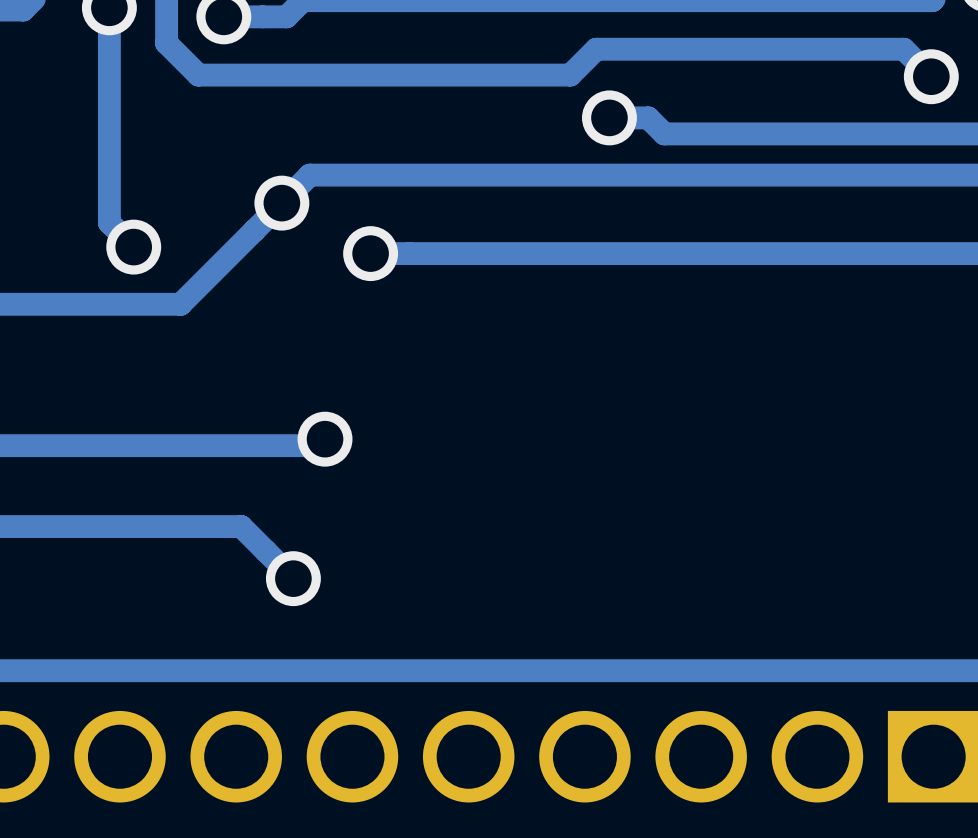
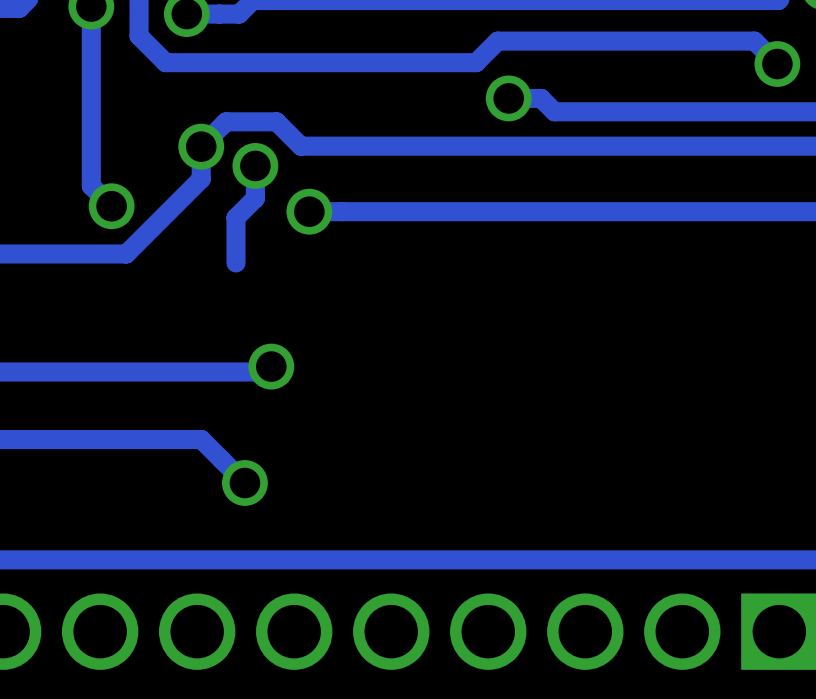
via: none -> (201, 146)
track: (360, 175) (309, 175) (180, 304) (151, 304) -> (300, 146) (276, 121) (226, 121) (201, 146) (201, 179) (126, 254)
track: none -> (255, 165) (255, 198) (235, 217) (235, 262)
via: none -> (255, 165)
via: (281, 203) -> none

